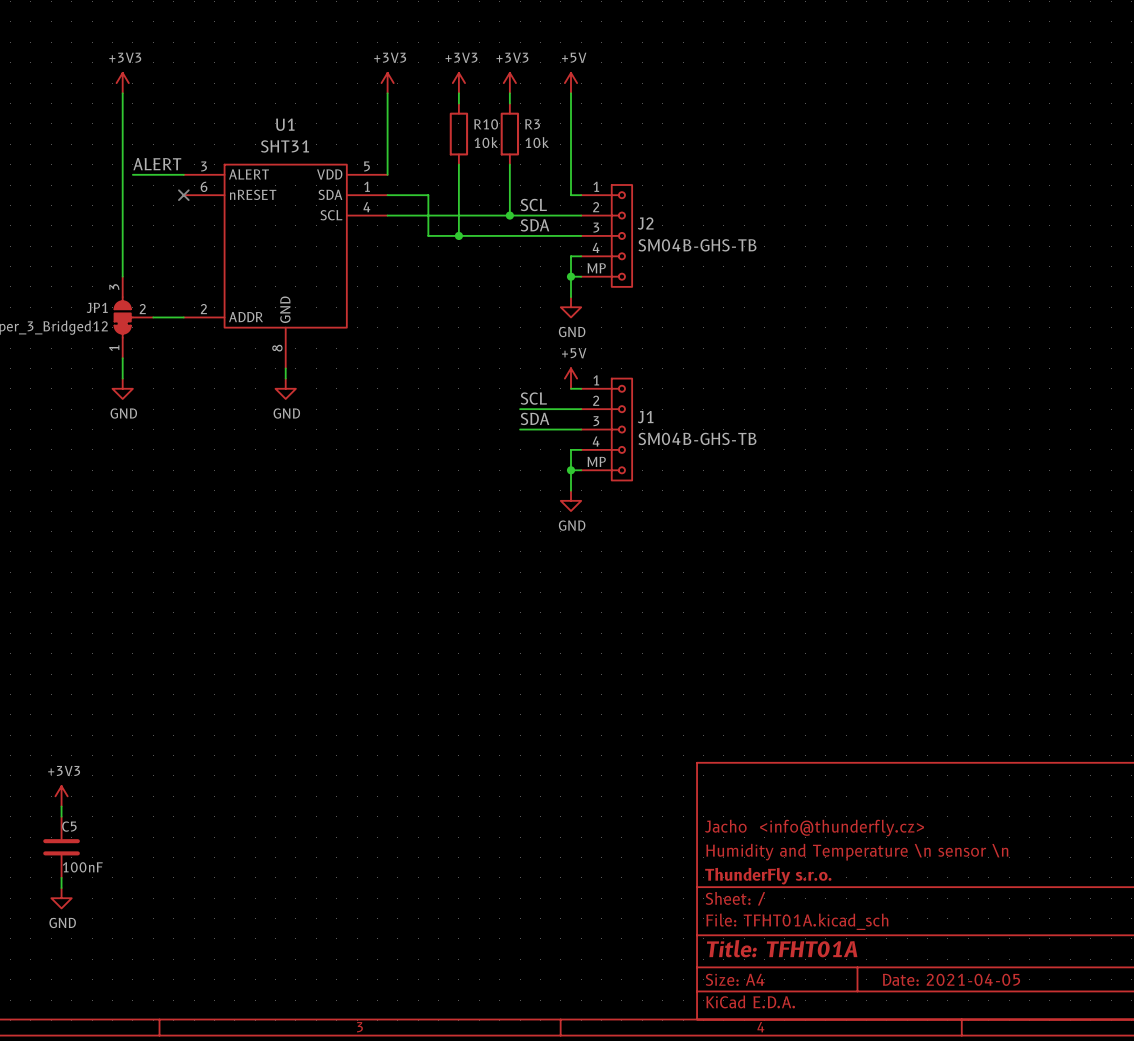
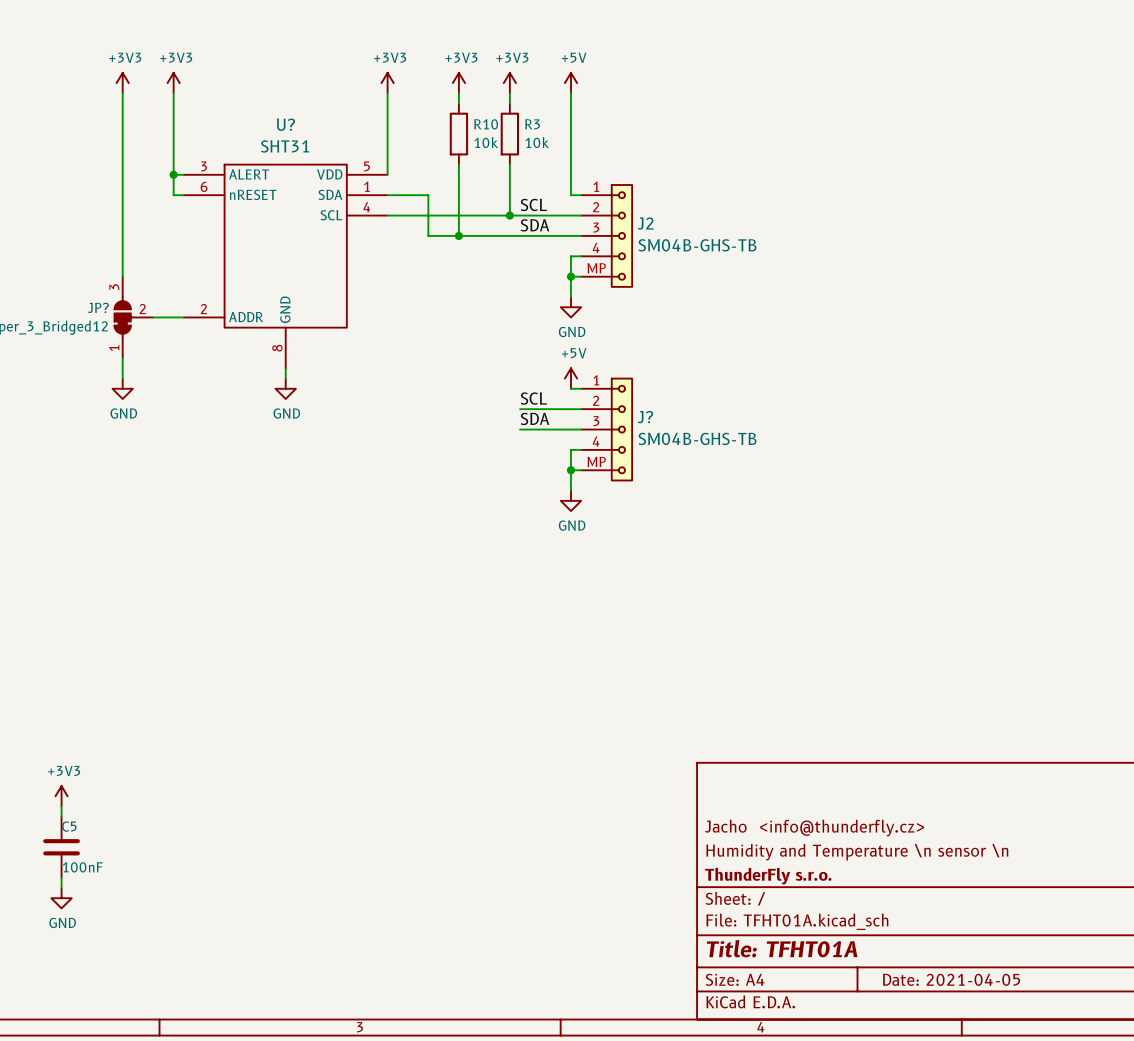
power symbol: none -> +3V3 (173, 83)
wire: none -> (173, 93) (173, 195) (183, 195)
U1 name: U1 (285, 124) -> U? (285, 124)
label: ALERT (157, 164) -> none
wire: (132, 174) (173, 174) -> none
junction: none -> (173, 174)
no-connect mark: (183, 195) -> none
JP1 name: JP1 (97, 307) -> JP? (98, 307)
J1 name: J1 (645, 417) -> J? (645, 417)

